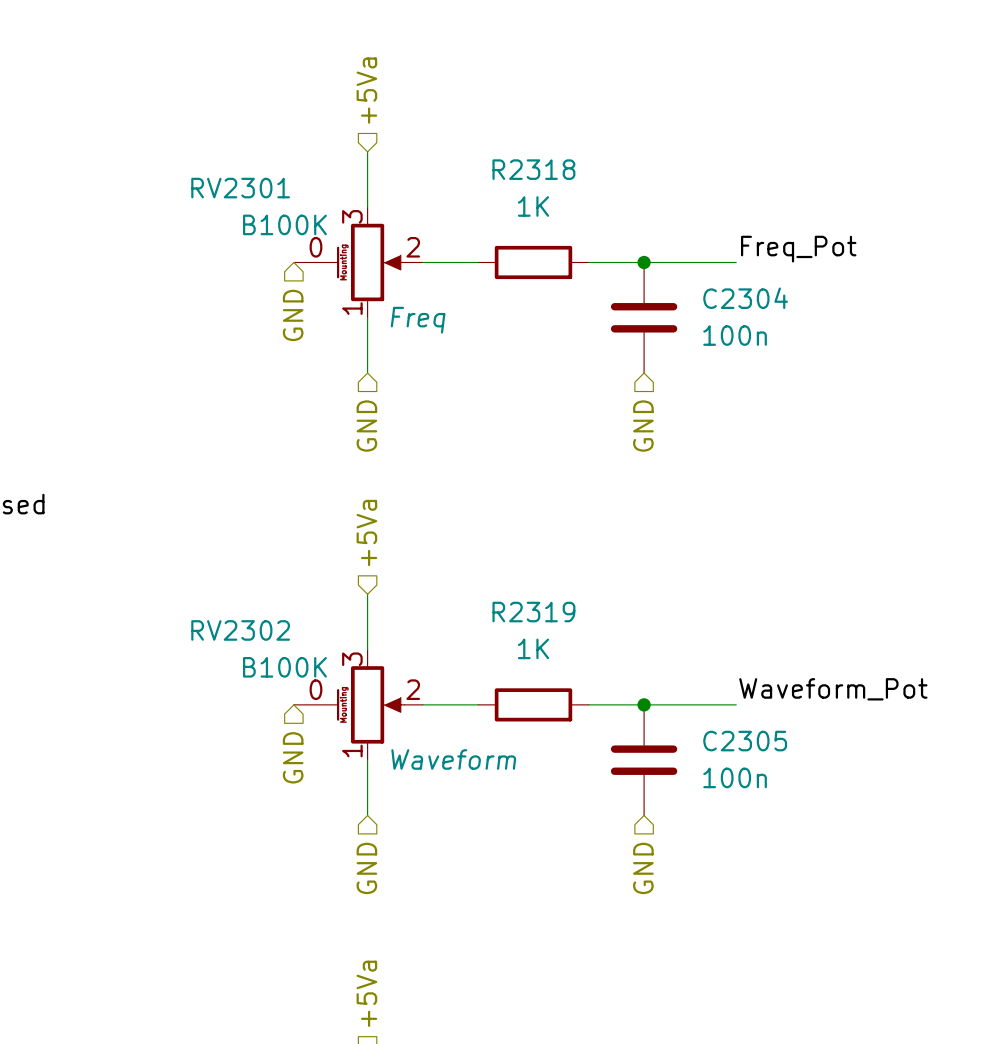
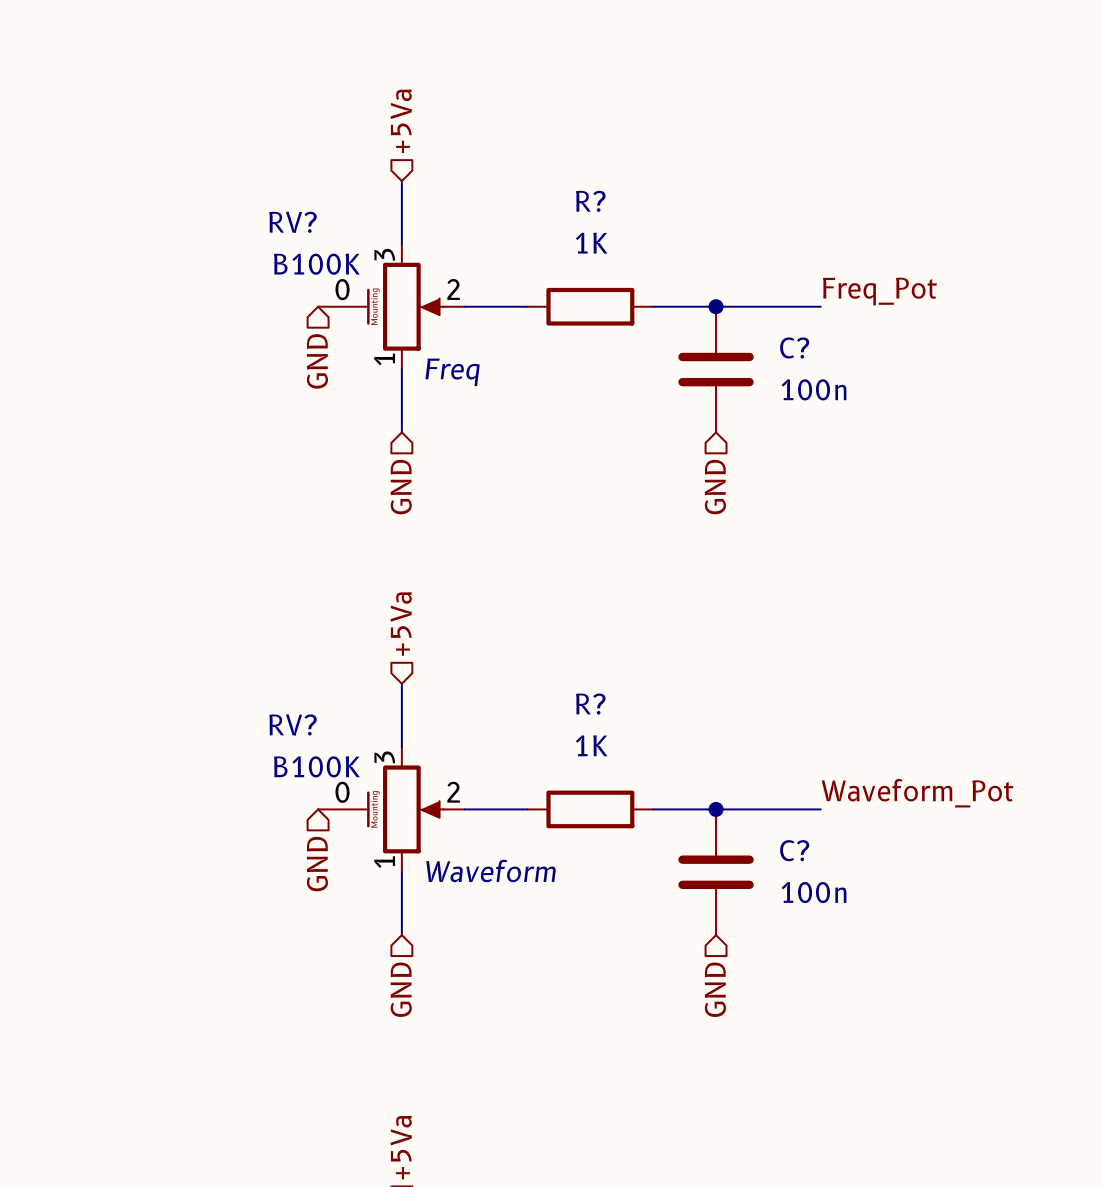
R2318 name: R2318 (533, 169) -> R? (590, 201)
RV2301 name: RV2301 (240, 188) -> RV? (292, 222)
C2304 name: C2304 (745, 298) -> C? (794, 347)
R2319 name: R2319 (533, 612) -> R? (590, 704)
RV2302 name: RV2302 (240, 630) -> RV? (292, 725)
C2305 name: C2305 (745, 741) -> C? (794, 850)

